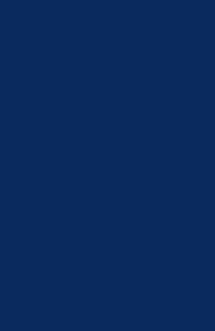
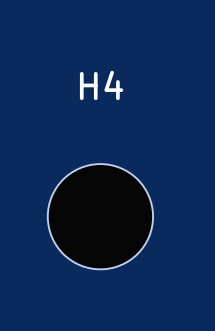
H4: none -> (100, 216)

